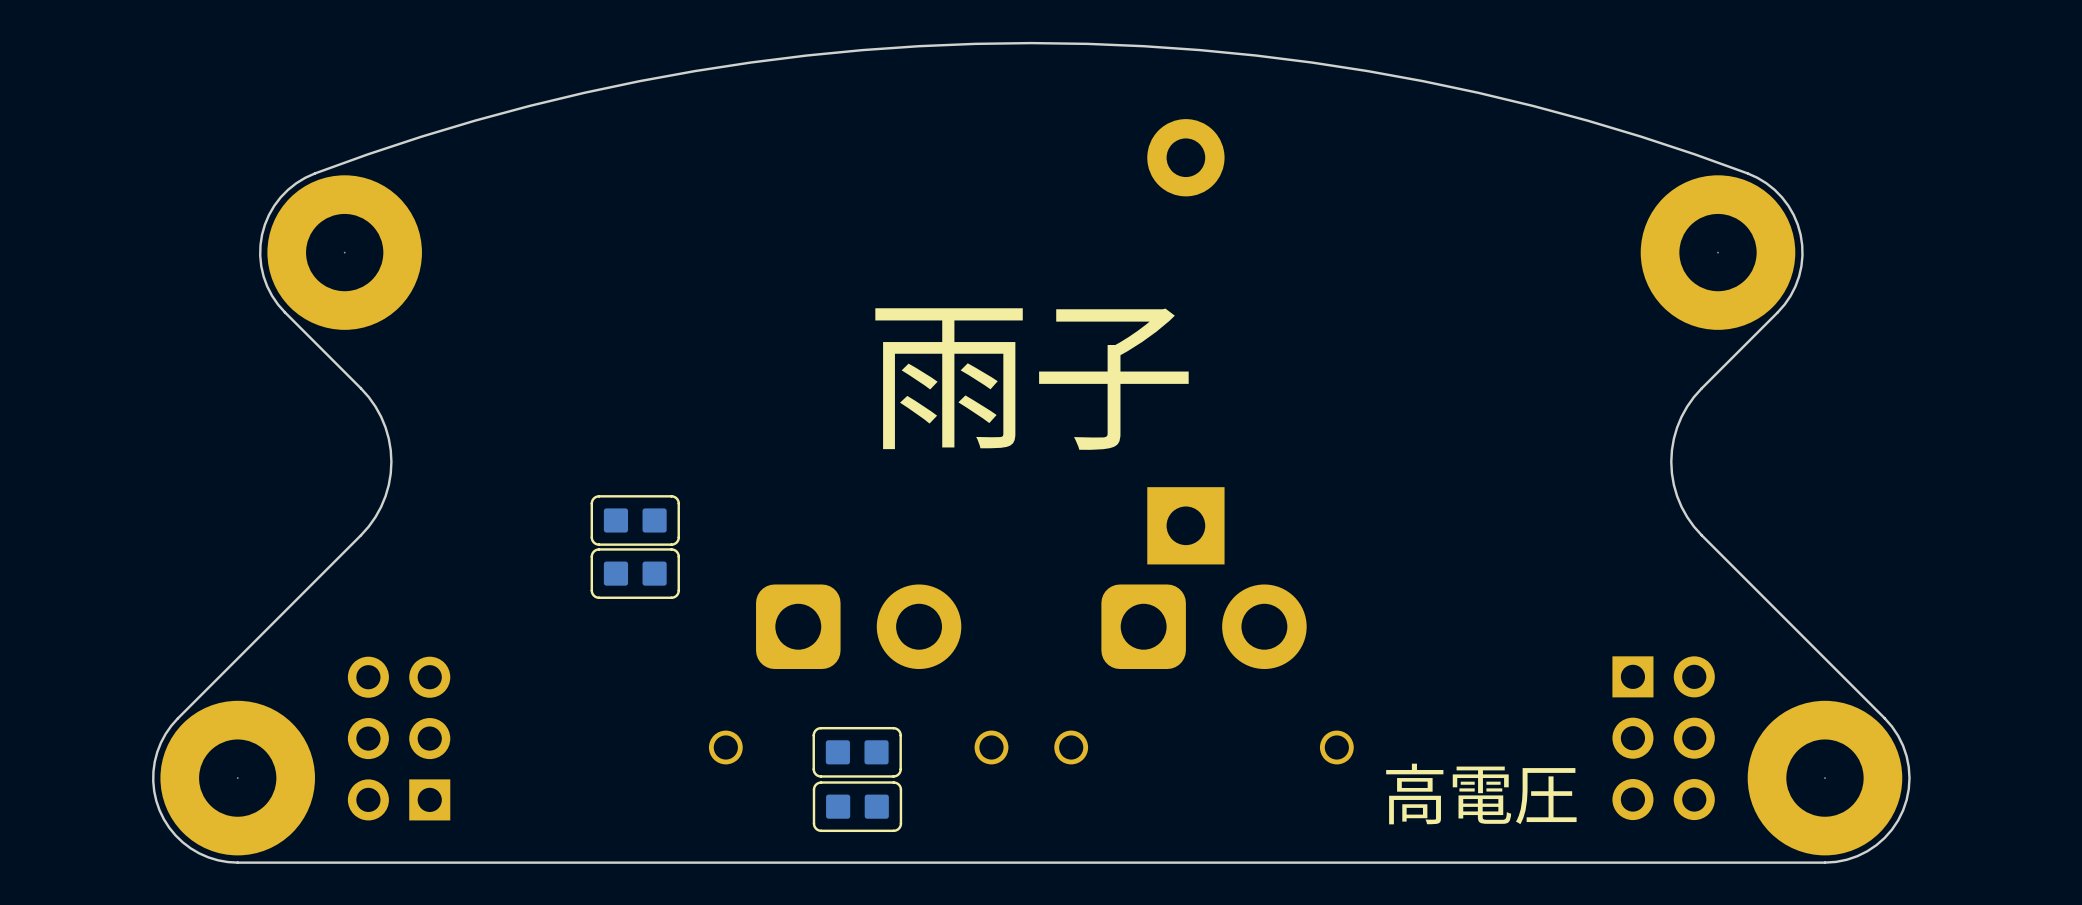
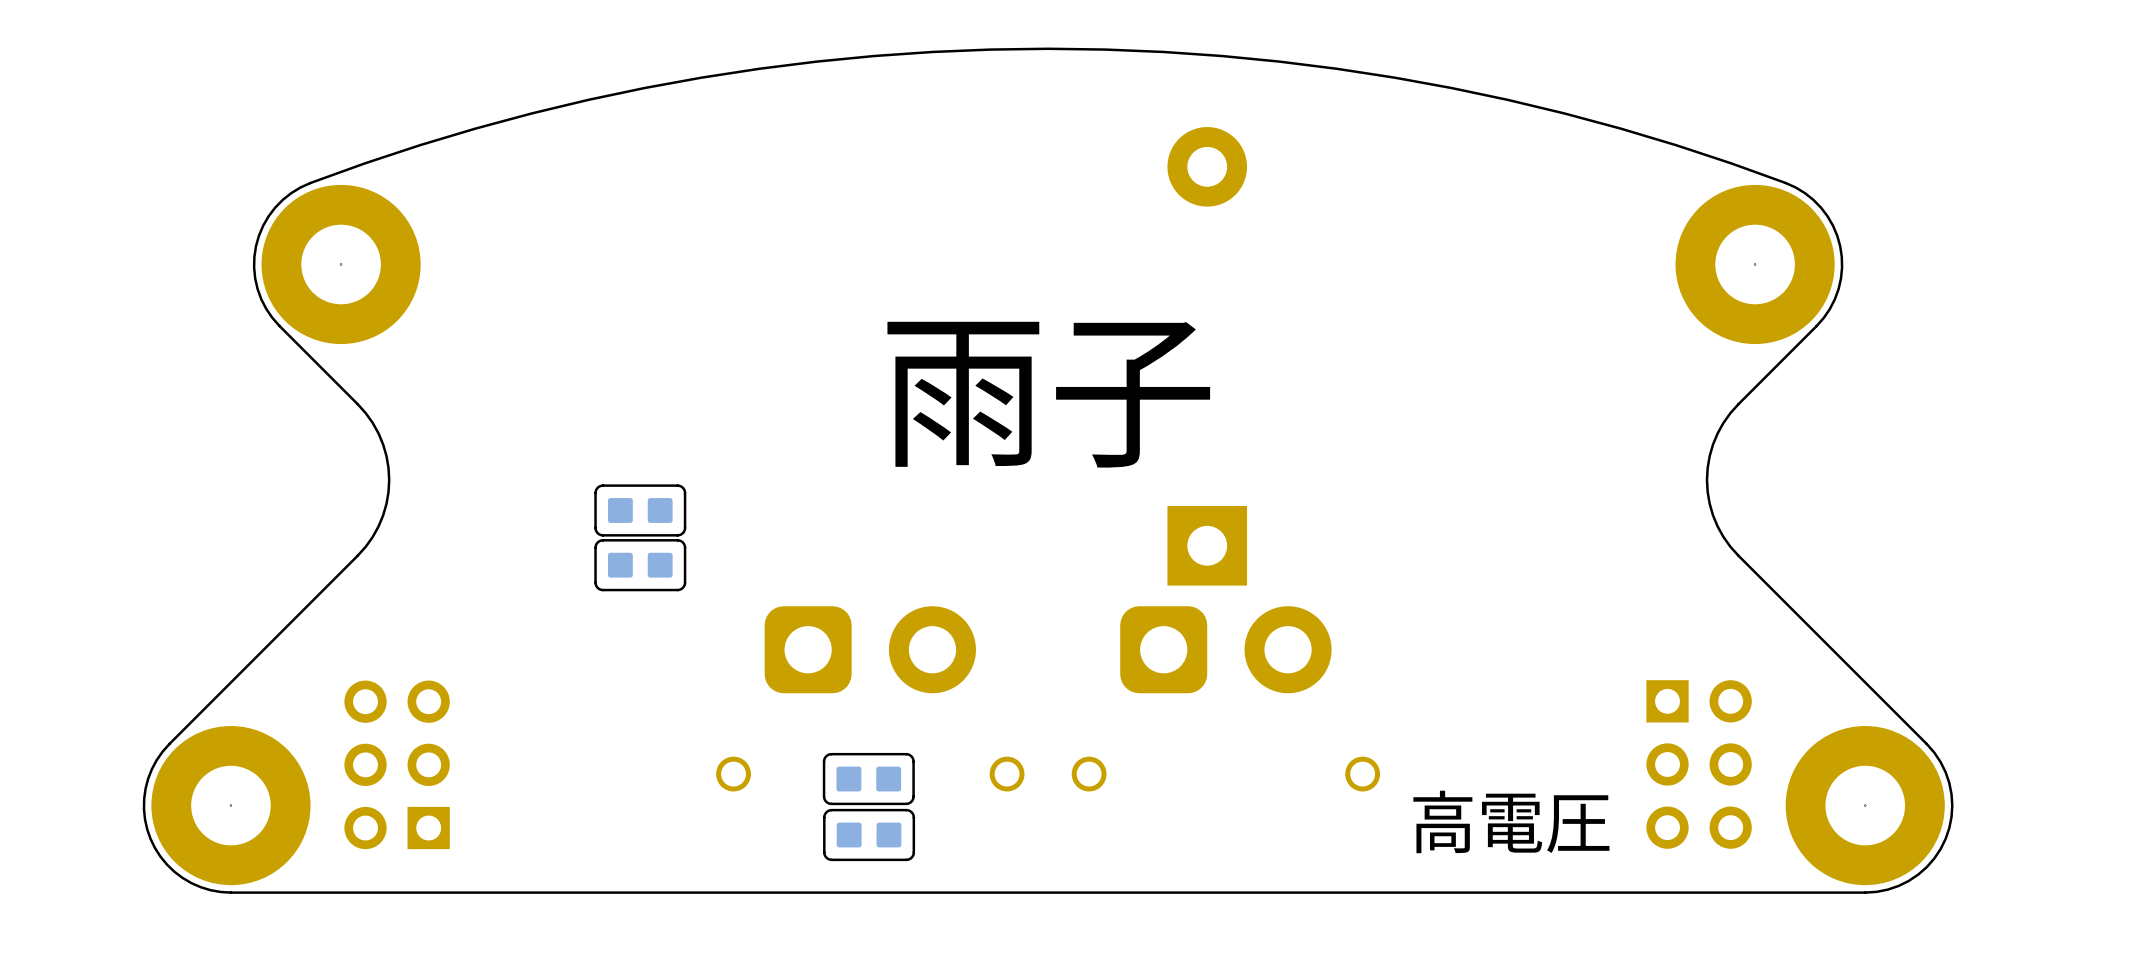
part: none -> (640, 510)
part: (635, 520) -> none
part: none -> (640, 565)
part: (635, 573) -> none

